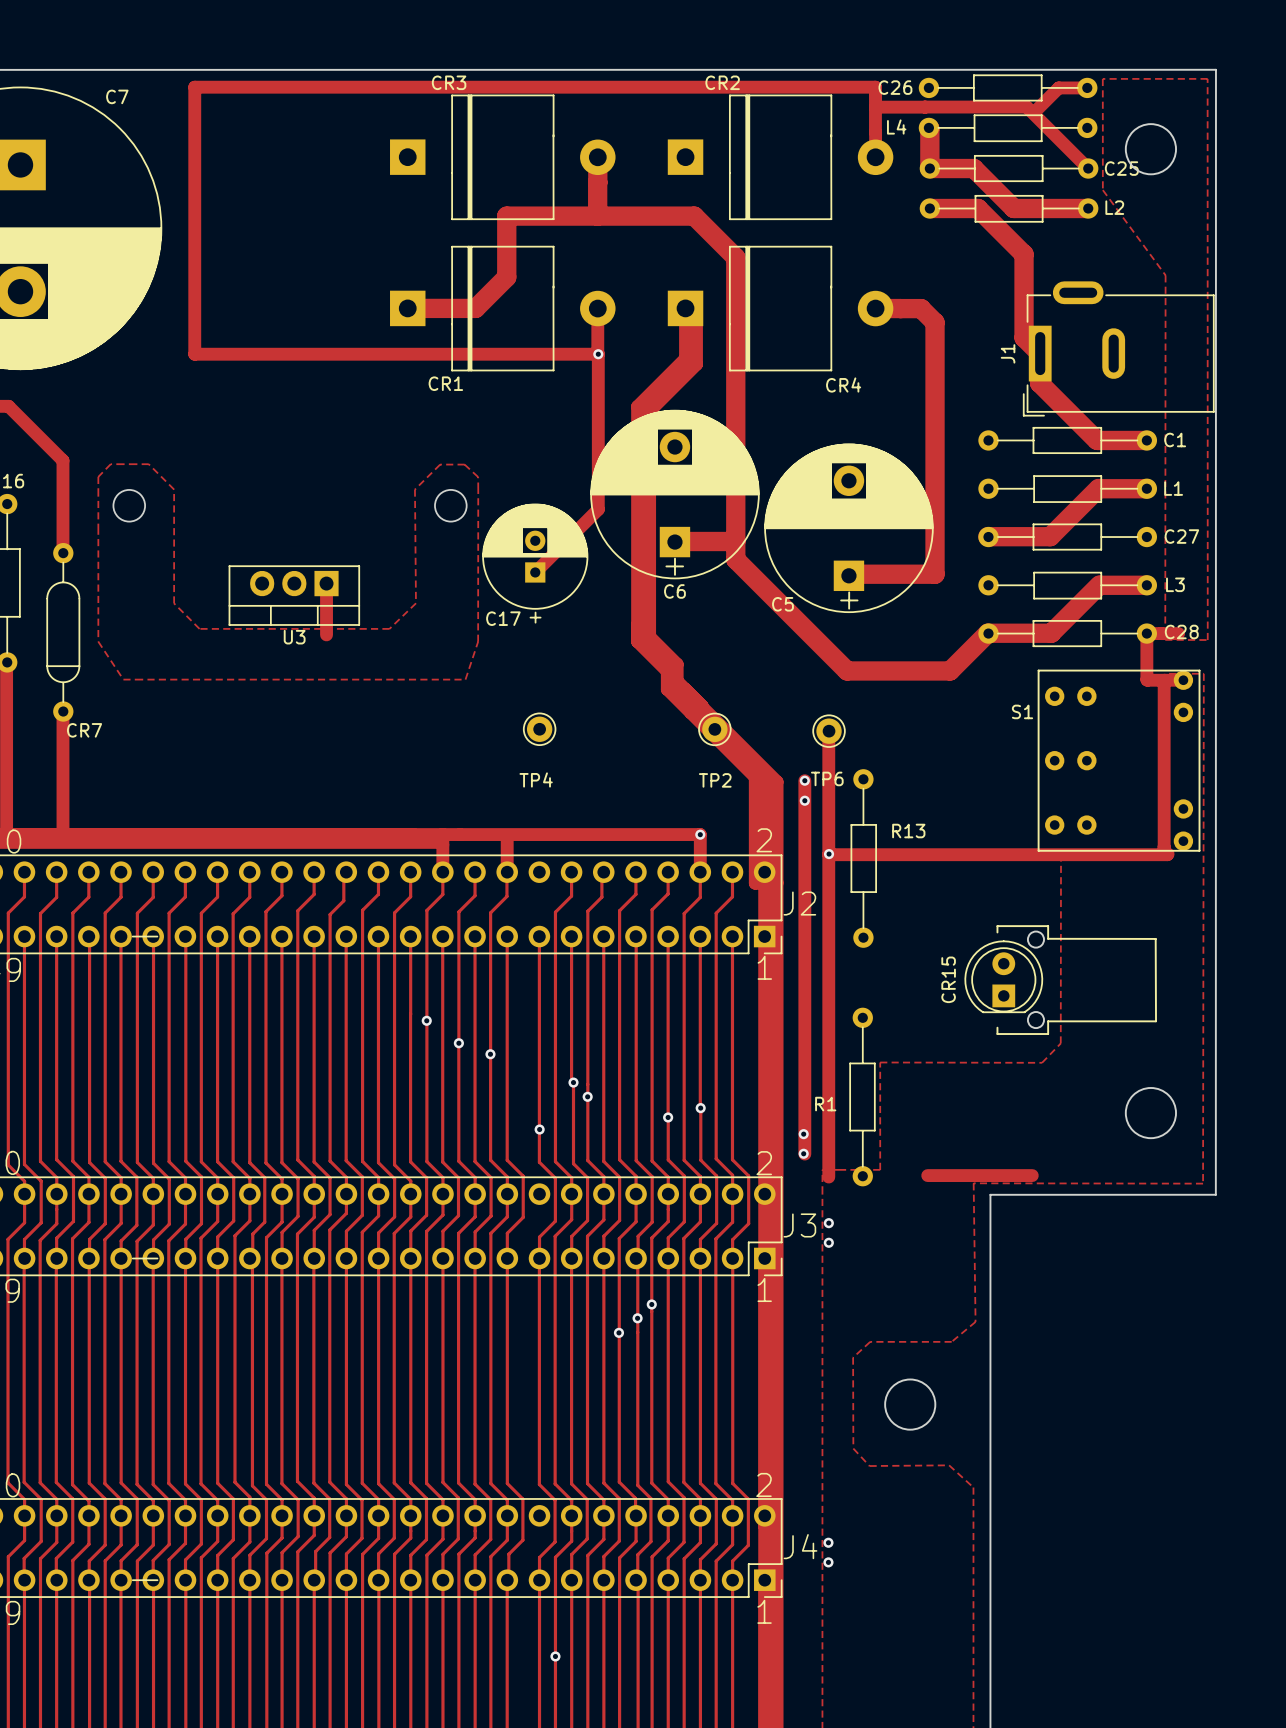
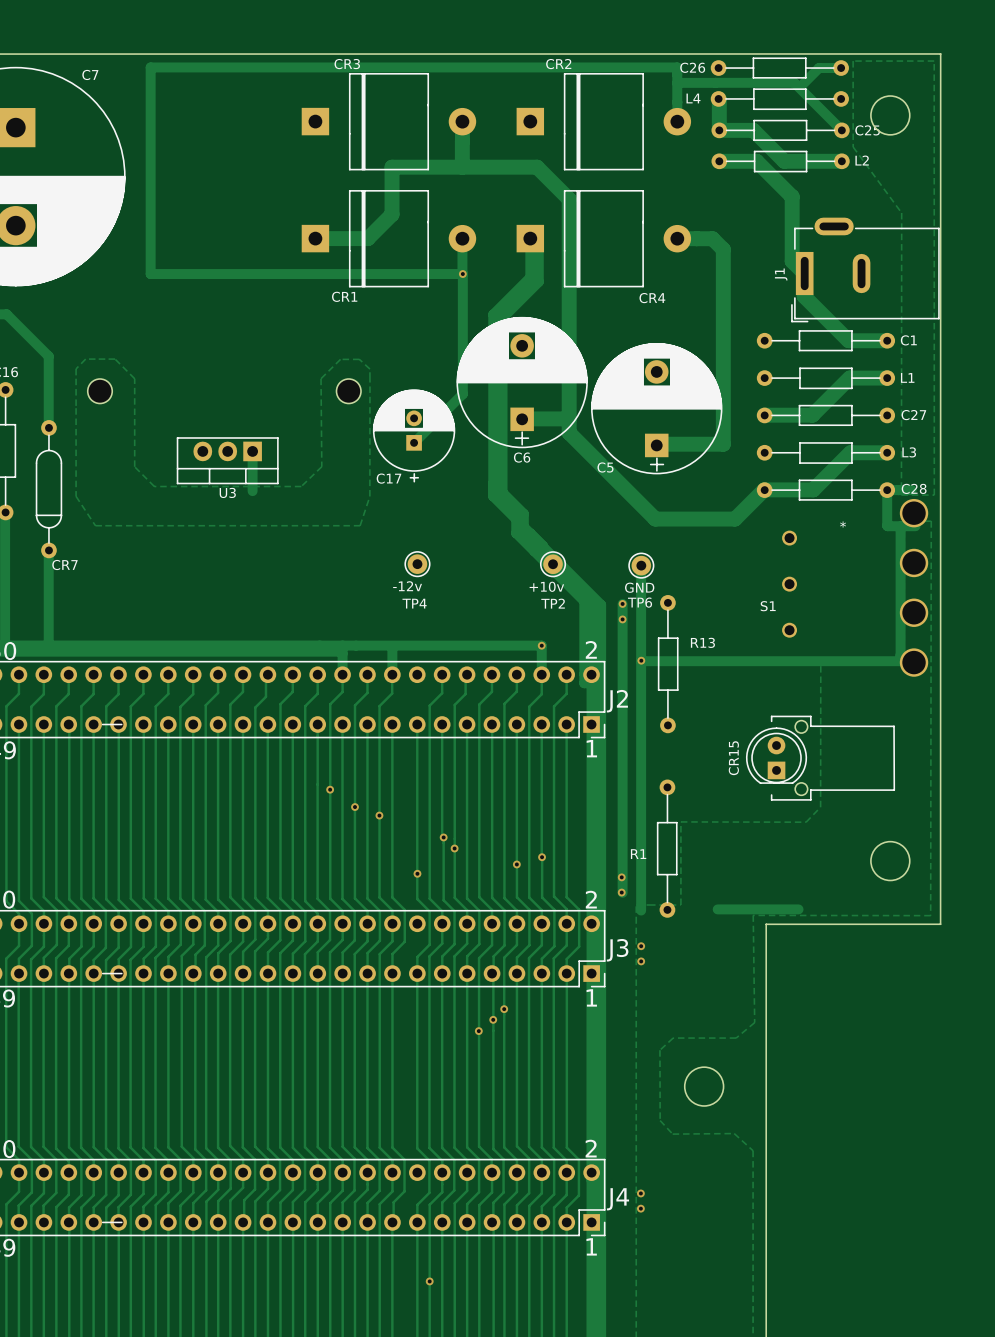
S1 footprint: [1037, 669, 1201, 852] -> [782, 498, 929, 677]
S1 name position: S1 (1022, 711) -> S1 (768, 606)
text: none -> -12v (407, 586)
text: none -> +10v (546, 586)
text: none -> GND (639, 587)

